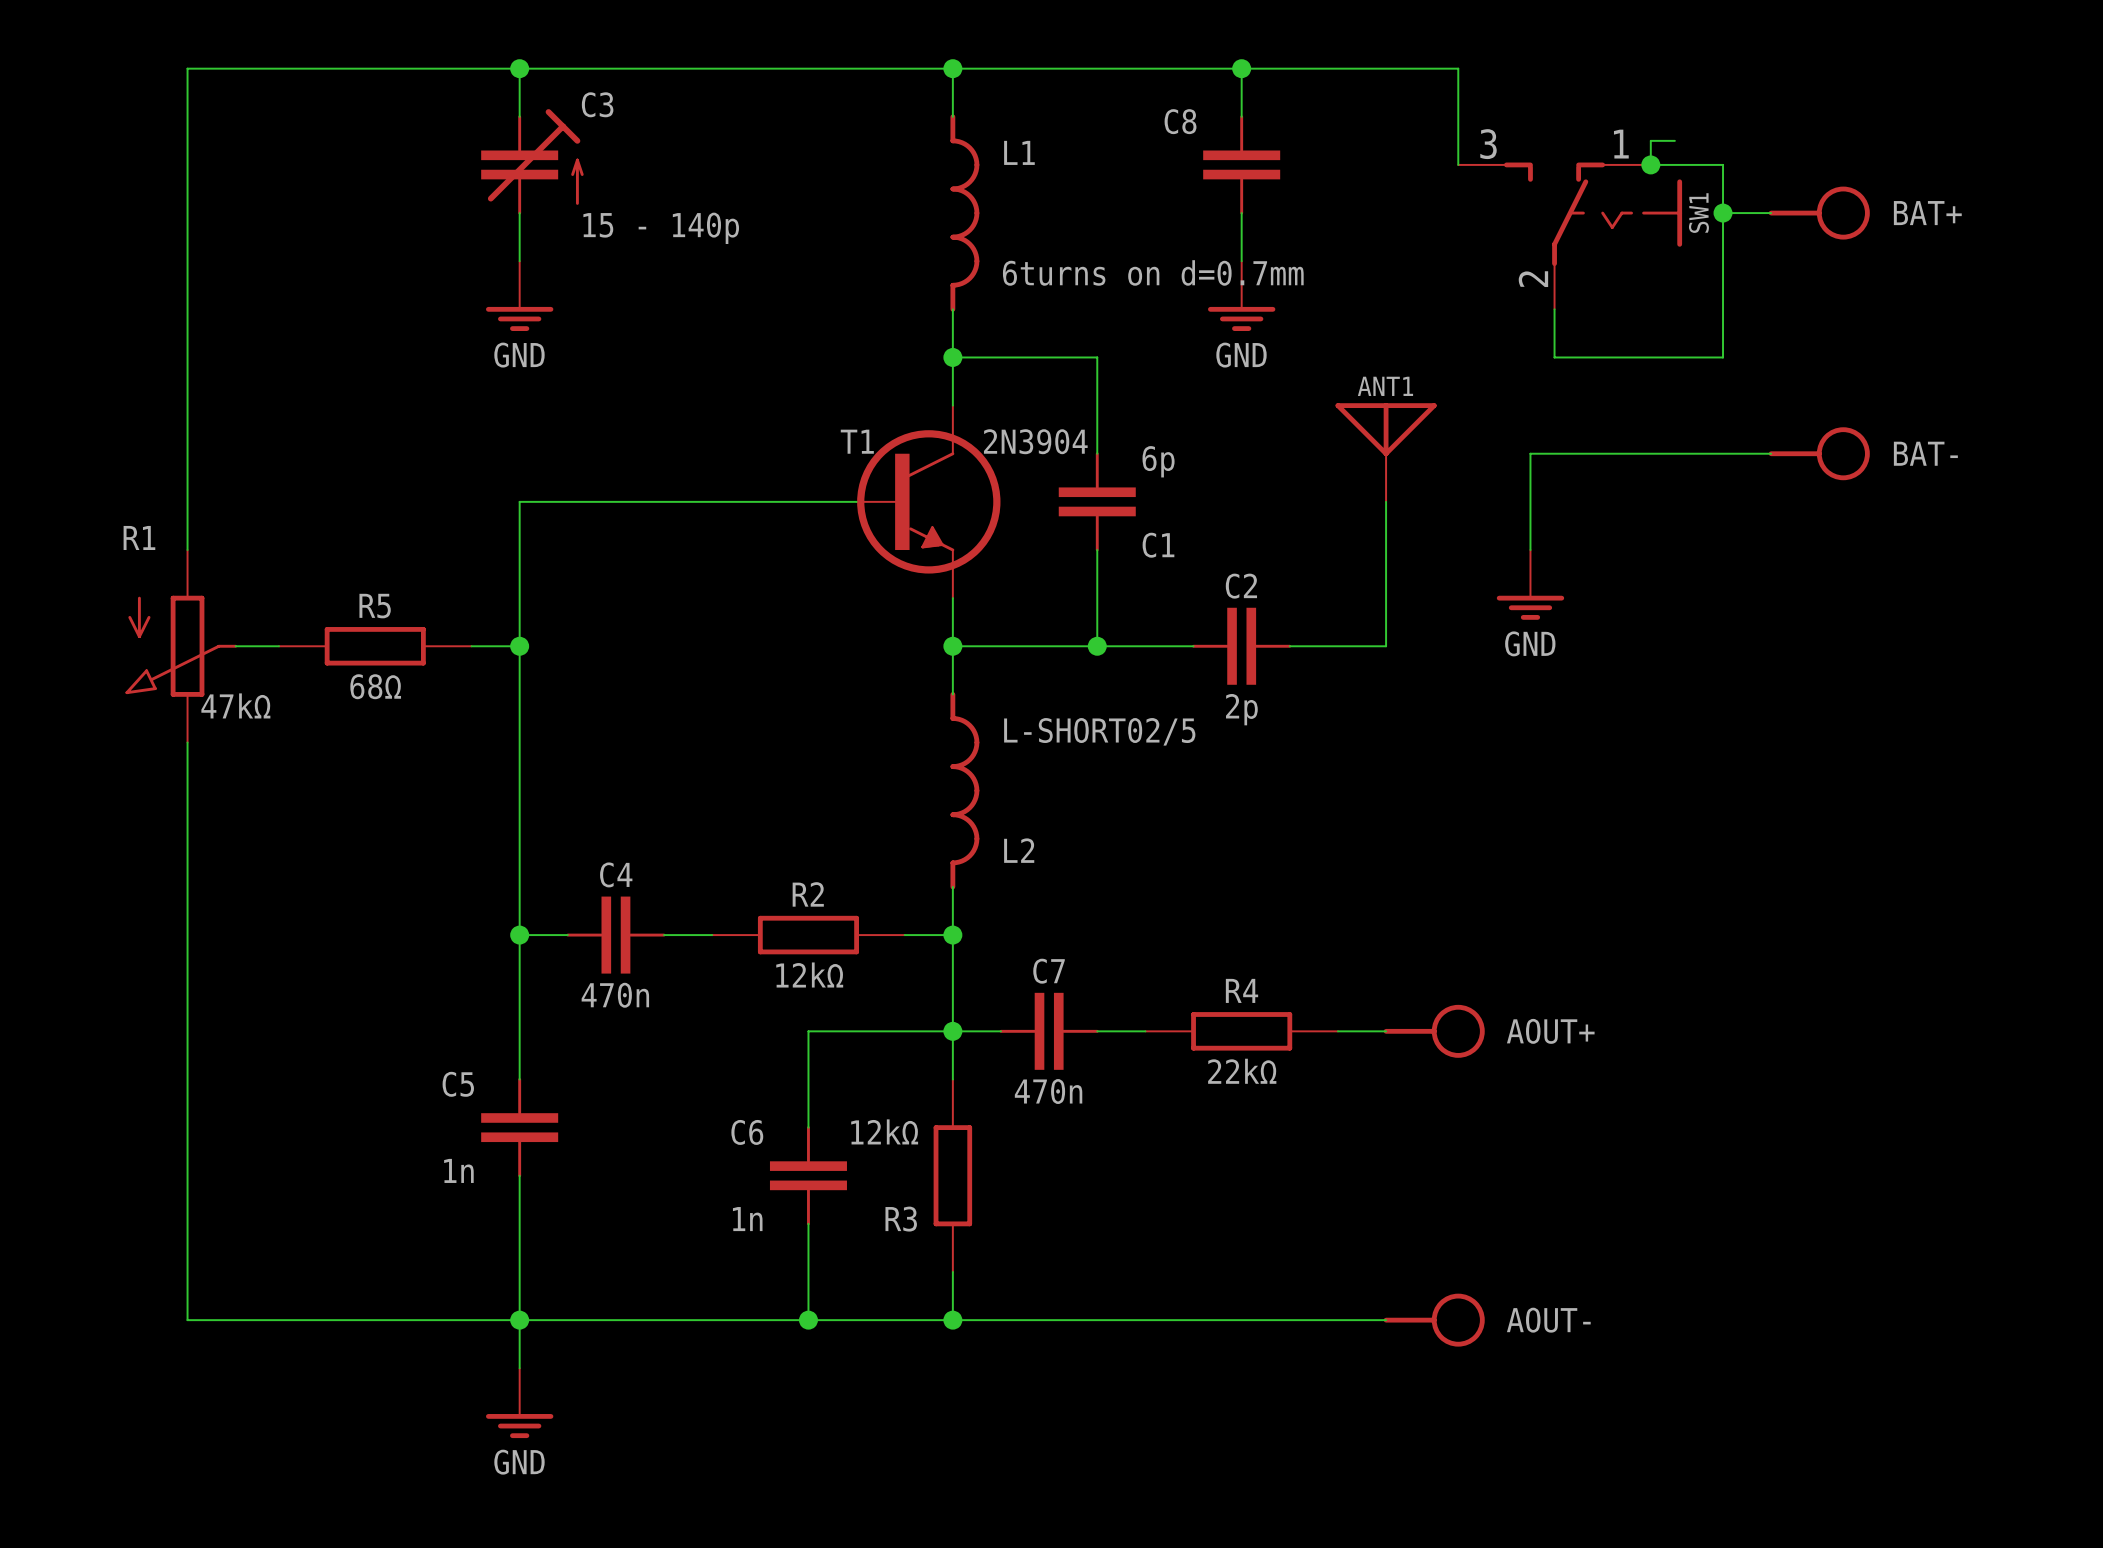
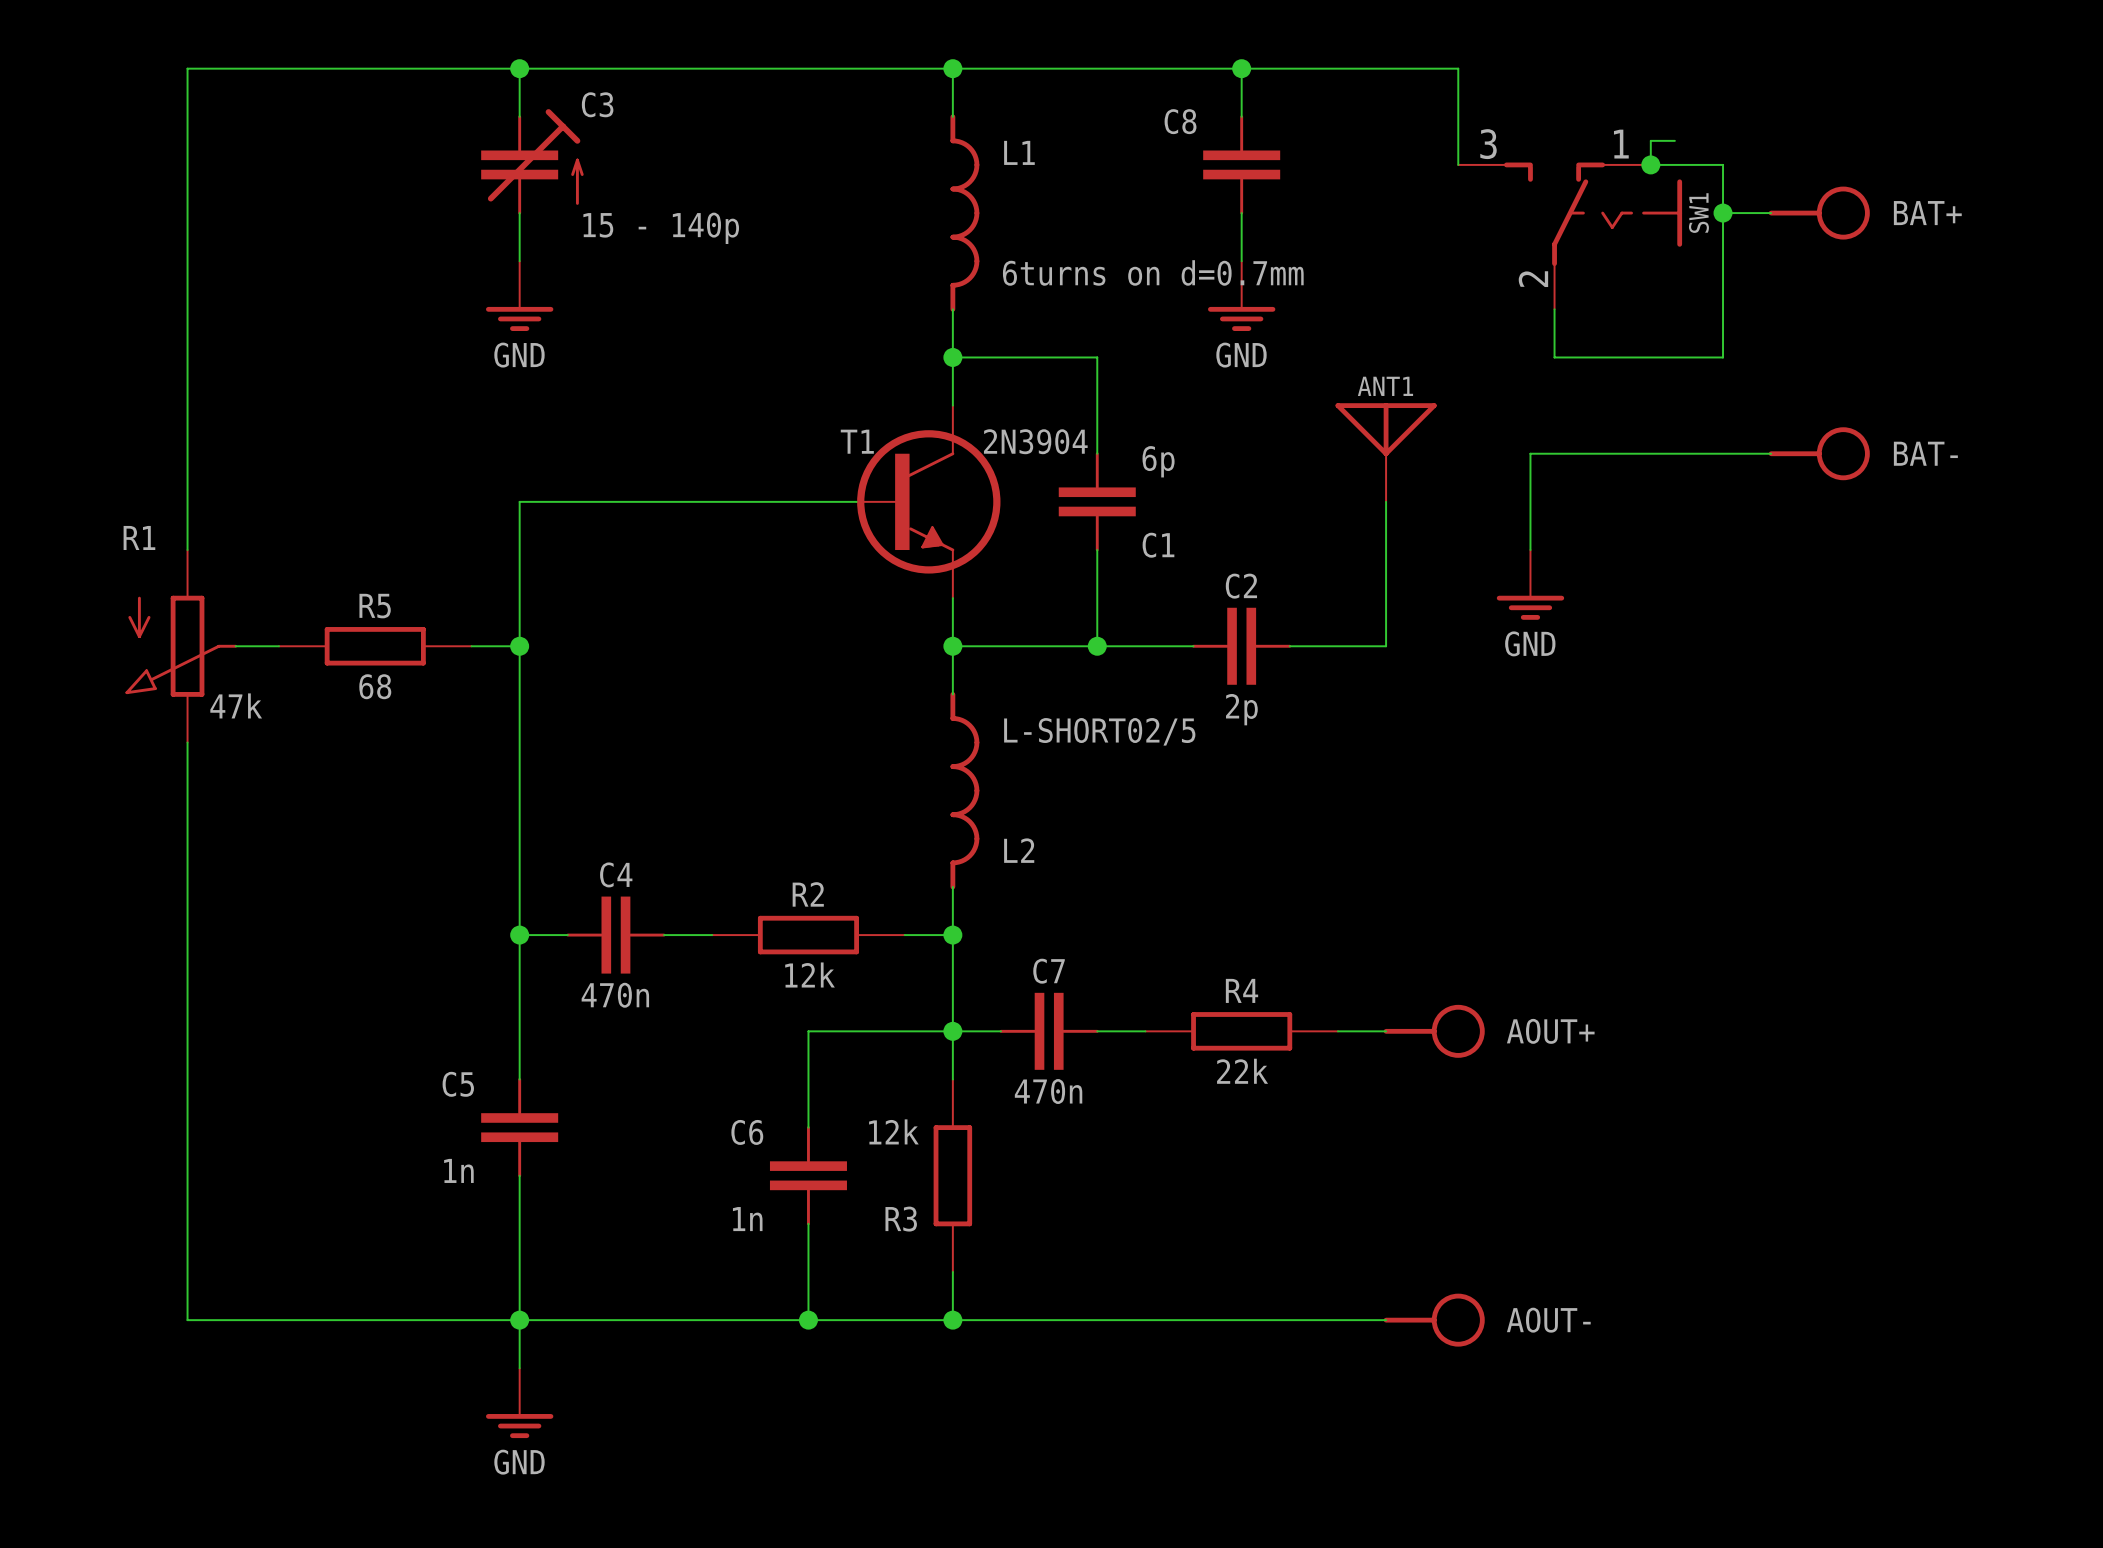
R5 value: 68Ω (375, 686) -> 68 (375, 686)
R1 value: 47kΩ (235, 705) -> 47k (236, 705)
R2 value: 12kΩ (809, 975) -> 12k (810, 975)
R4 value: 22kΩ (1242, 1071) -> 22k (1242, 1071)
R3 value: 12kΩ (884, 1131) -> 12k (893, 1131)

